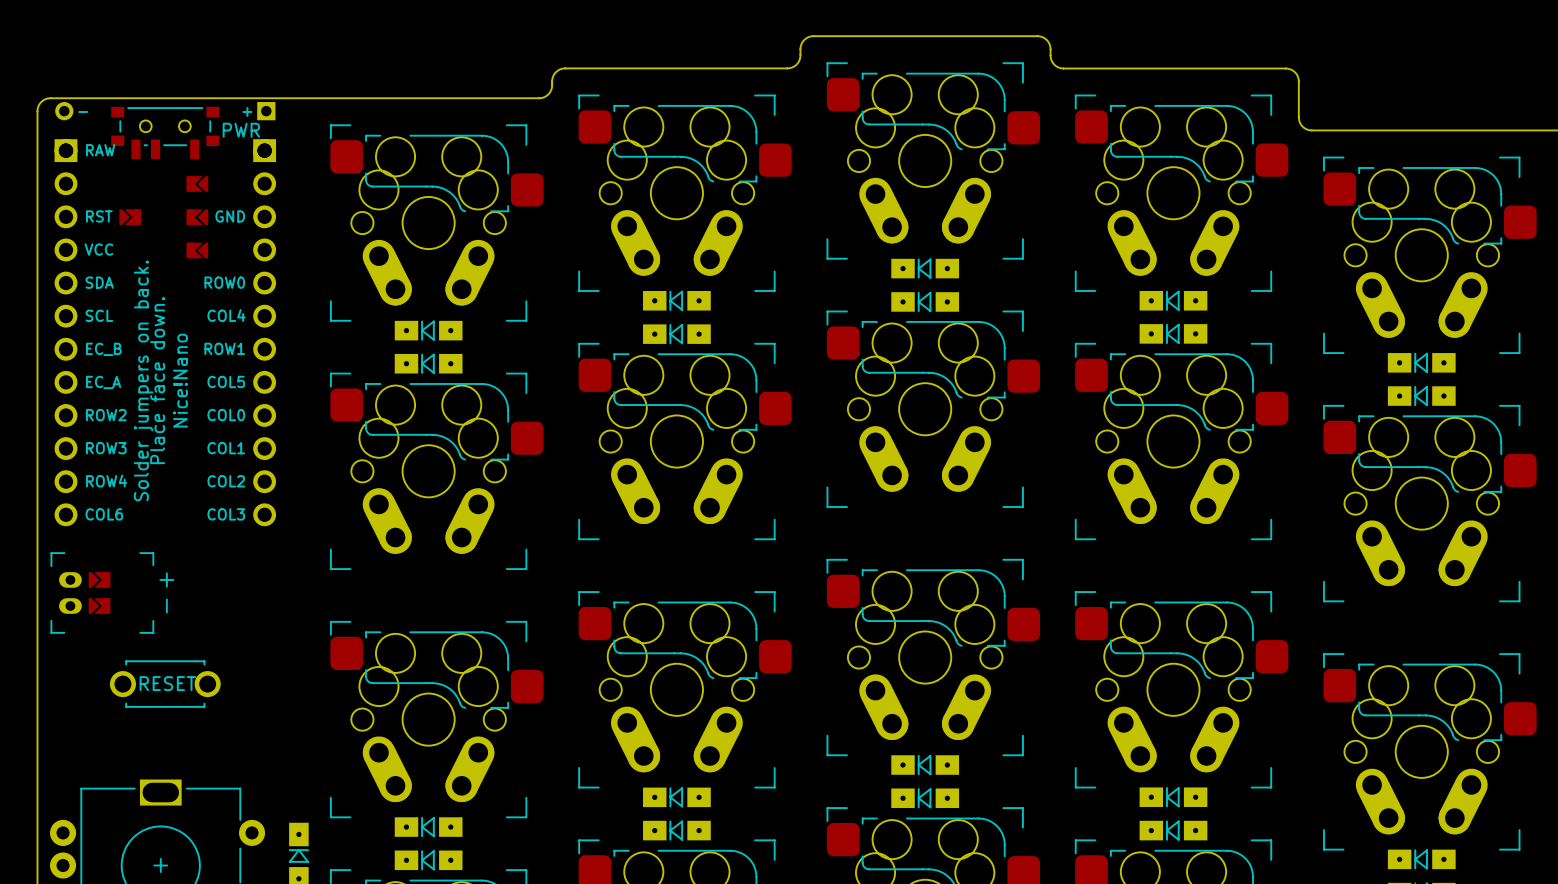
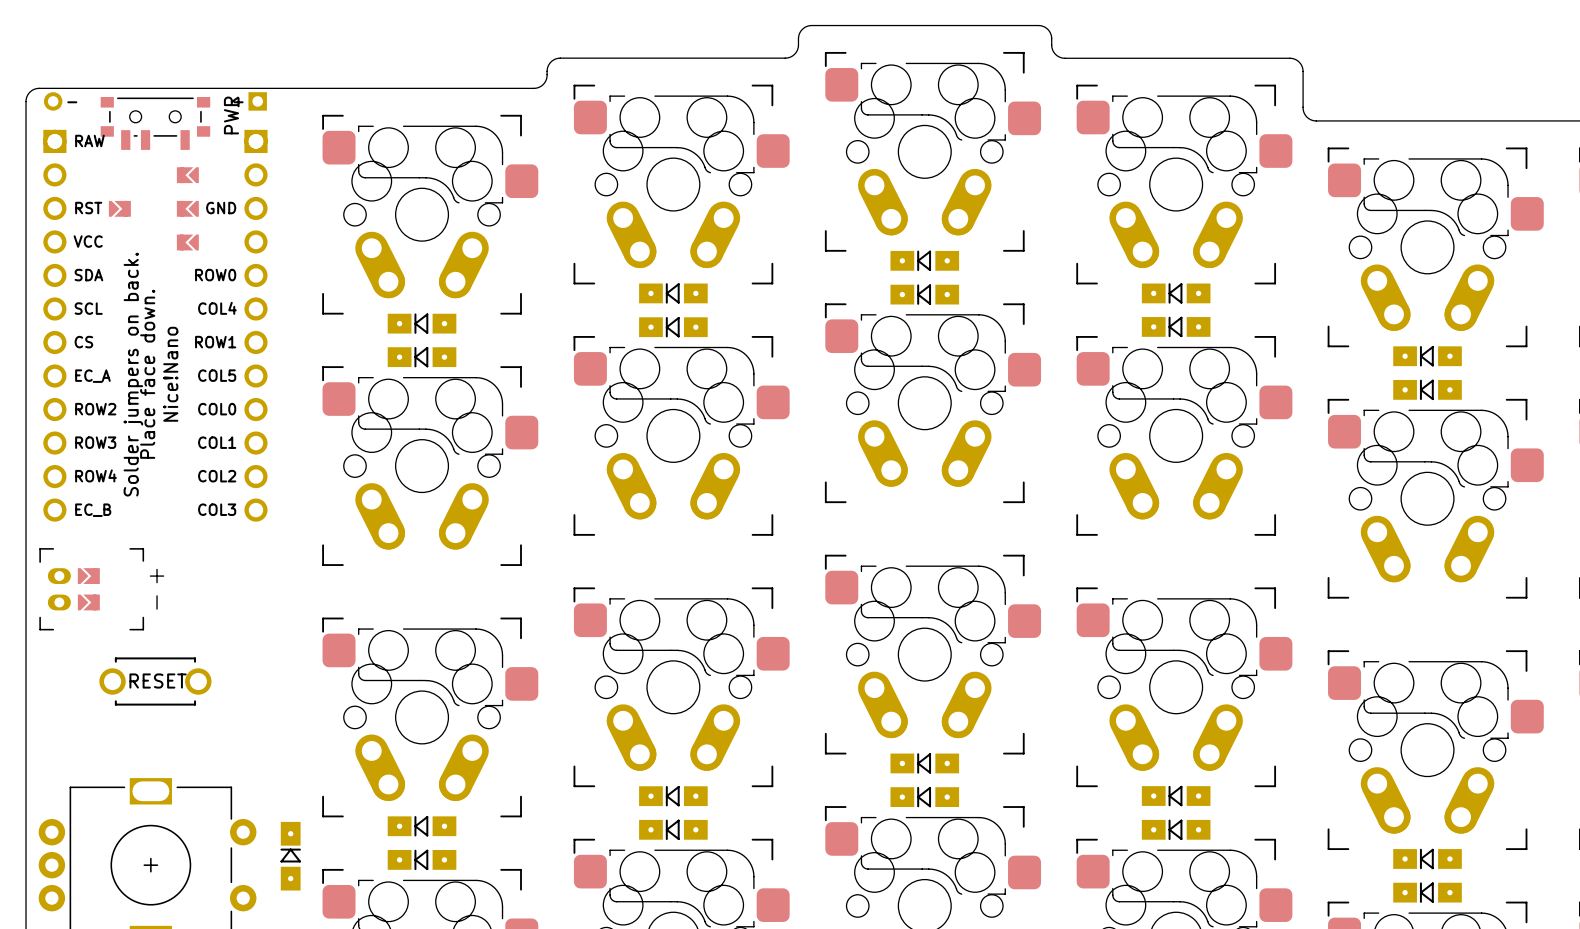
PWR name rotation: 0° (241, 130) -> 90° counterclockwise (231, 115)
part text: EC_B (103, 349) -> CS (83, 342)
part text: COL6 (104, 514) -> EC_B (93, 510)

